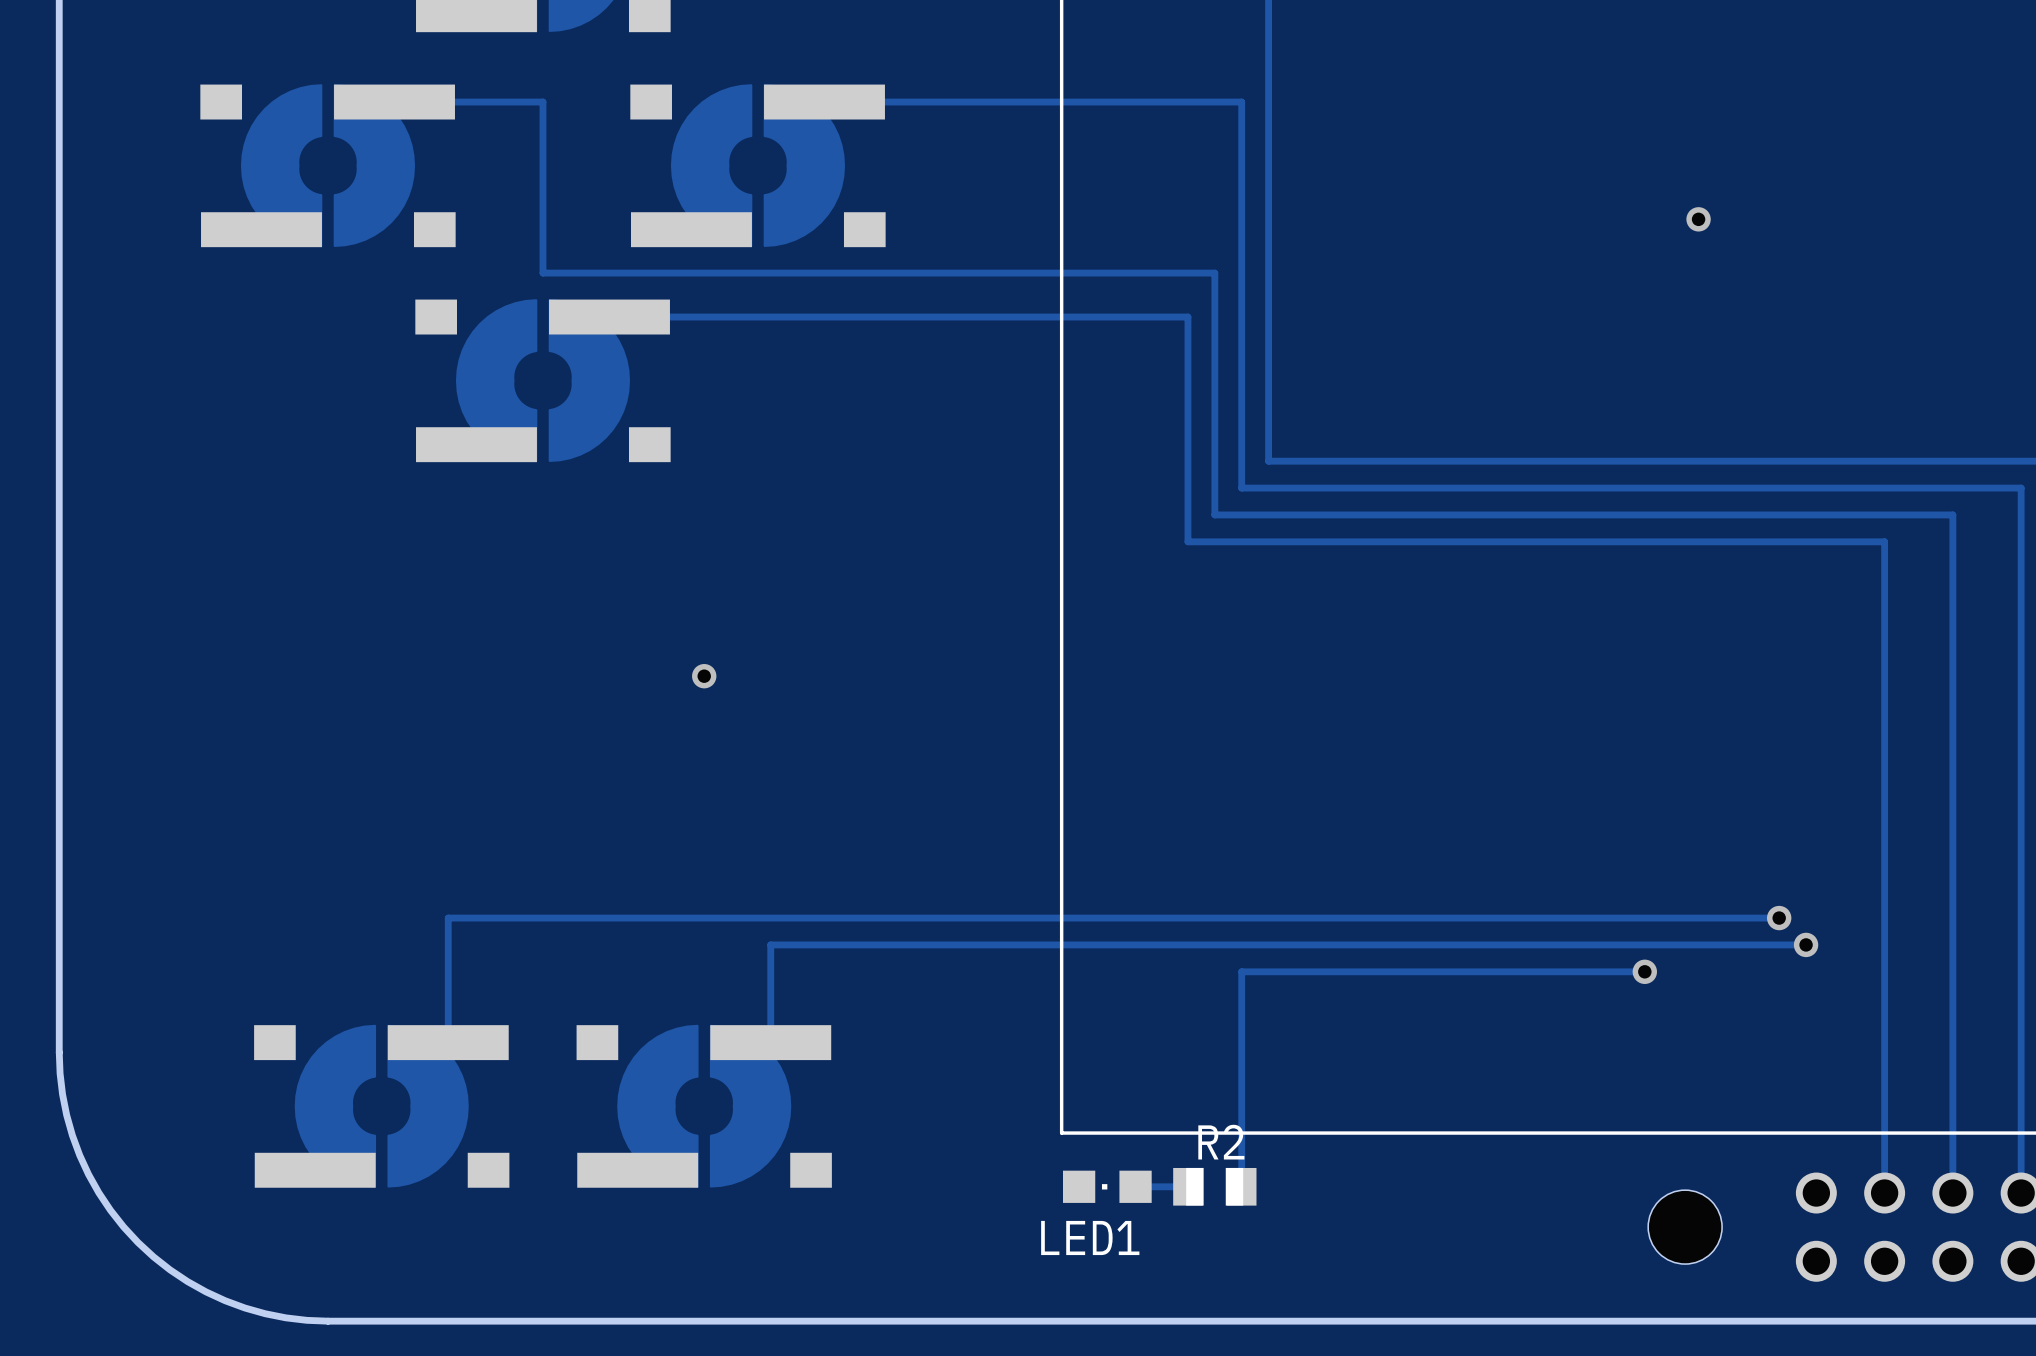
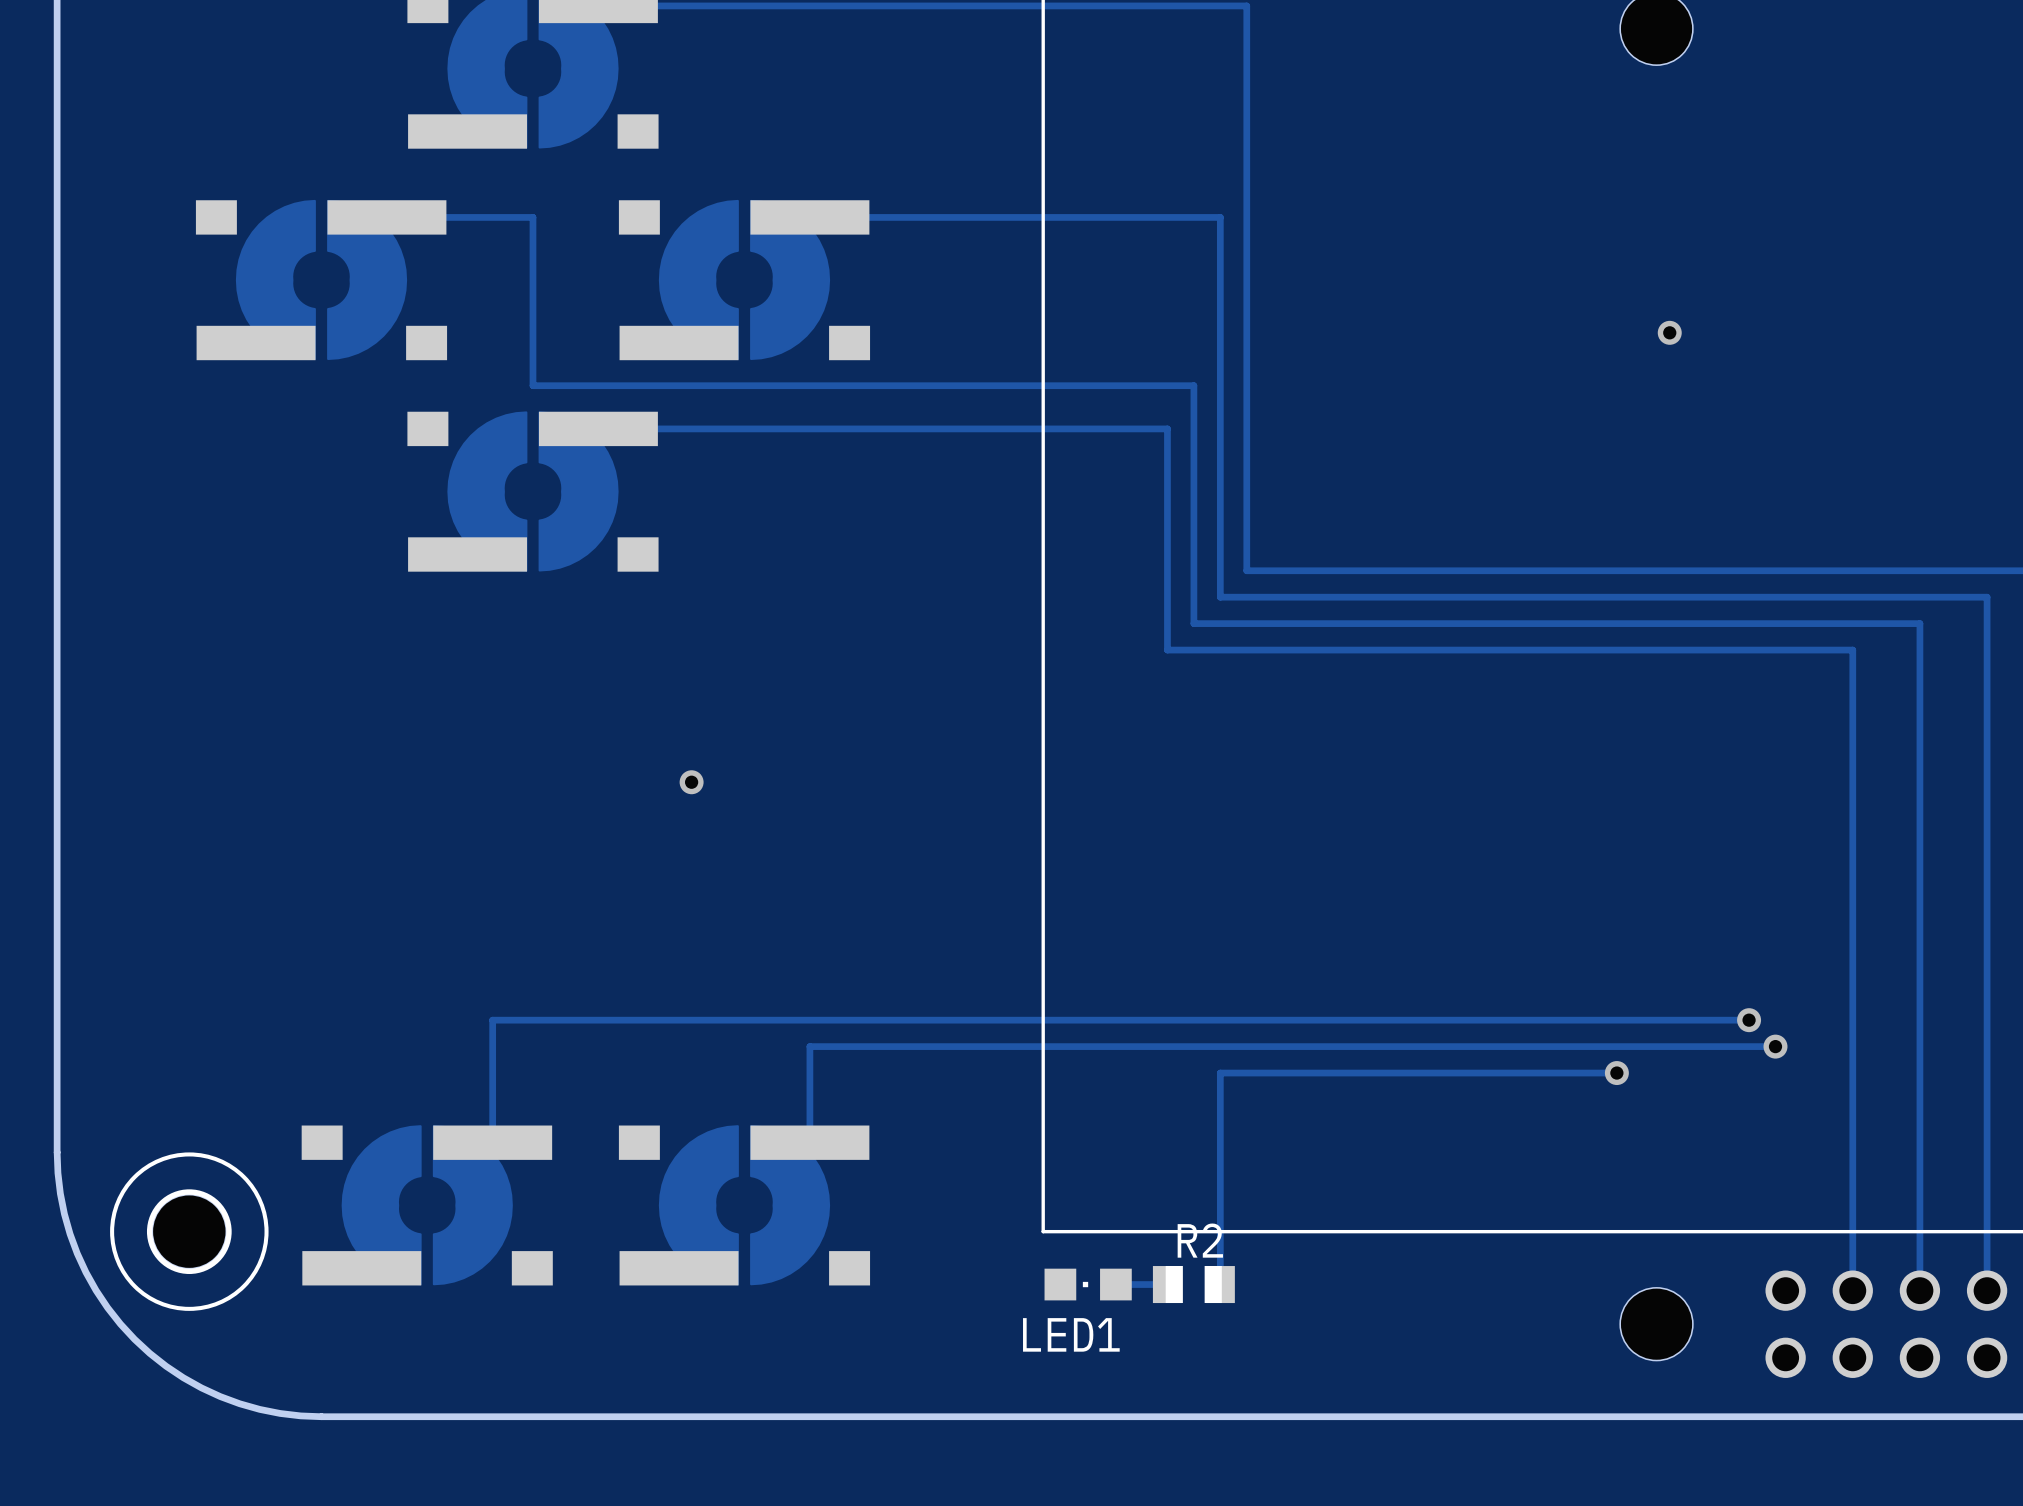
track: (502, 918) (448, 918) (448, 1042) -> (492, 1020) (492, 1142)
track: (824, 944) (770, 944) (770, 1042) -> (809, 1046) (809, 1142)
part position: (381, 1106) -> (427, 1205)
part position: (704, 1106) -> (744, 1205)
part: none -> (189, 1231)

